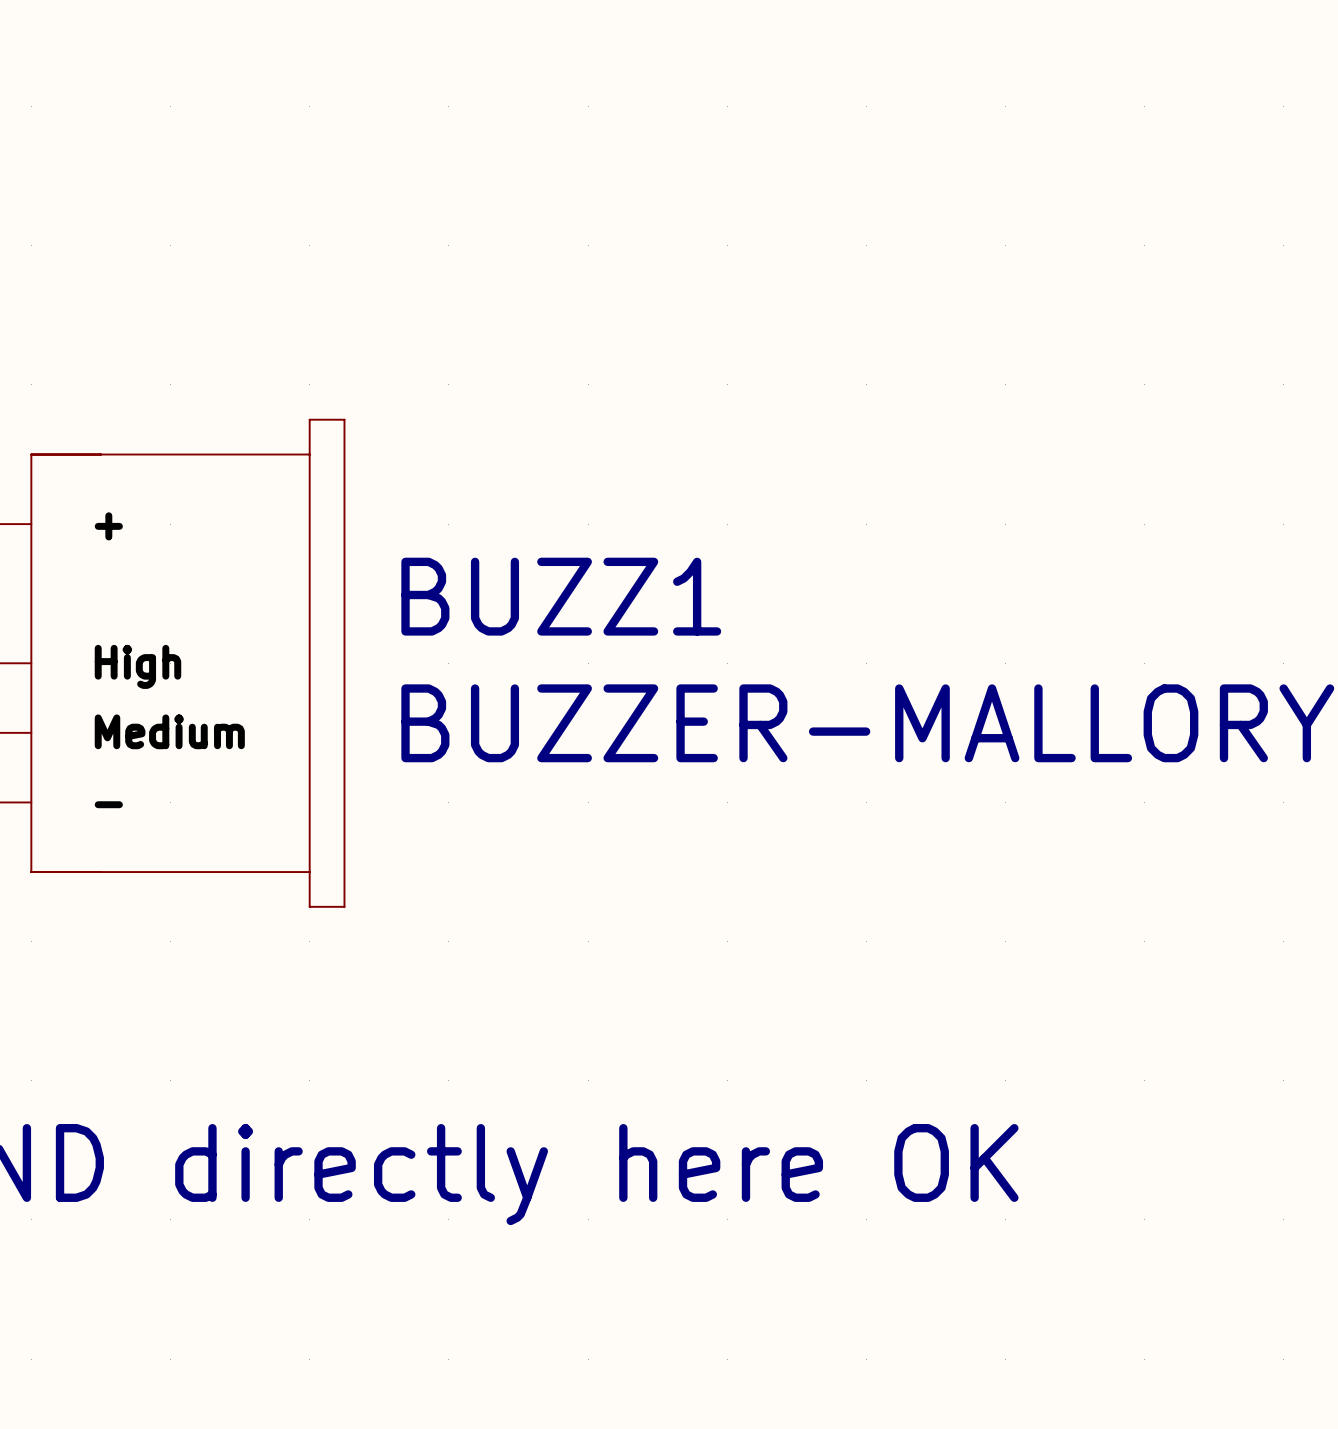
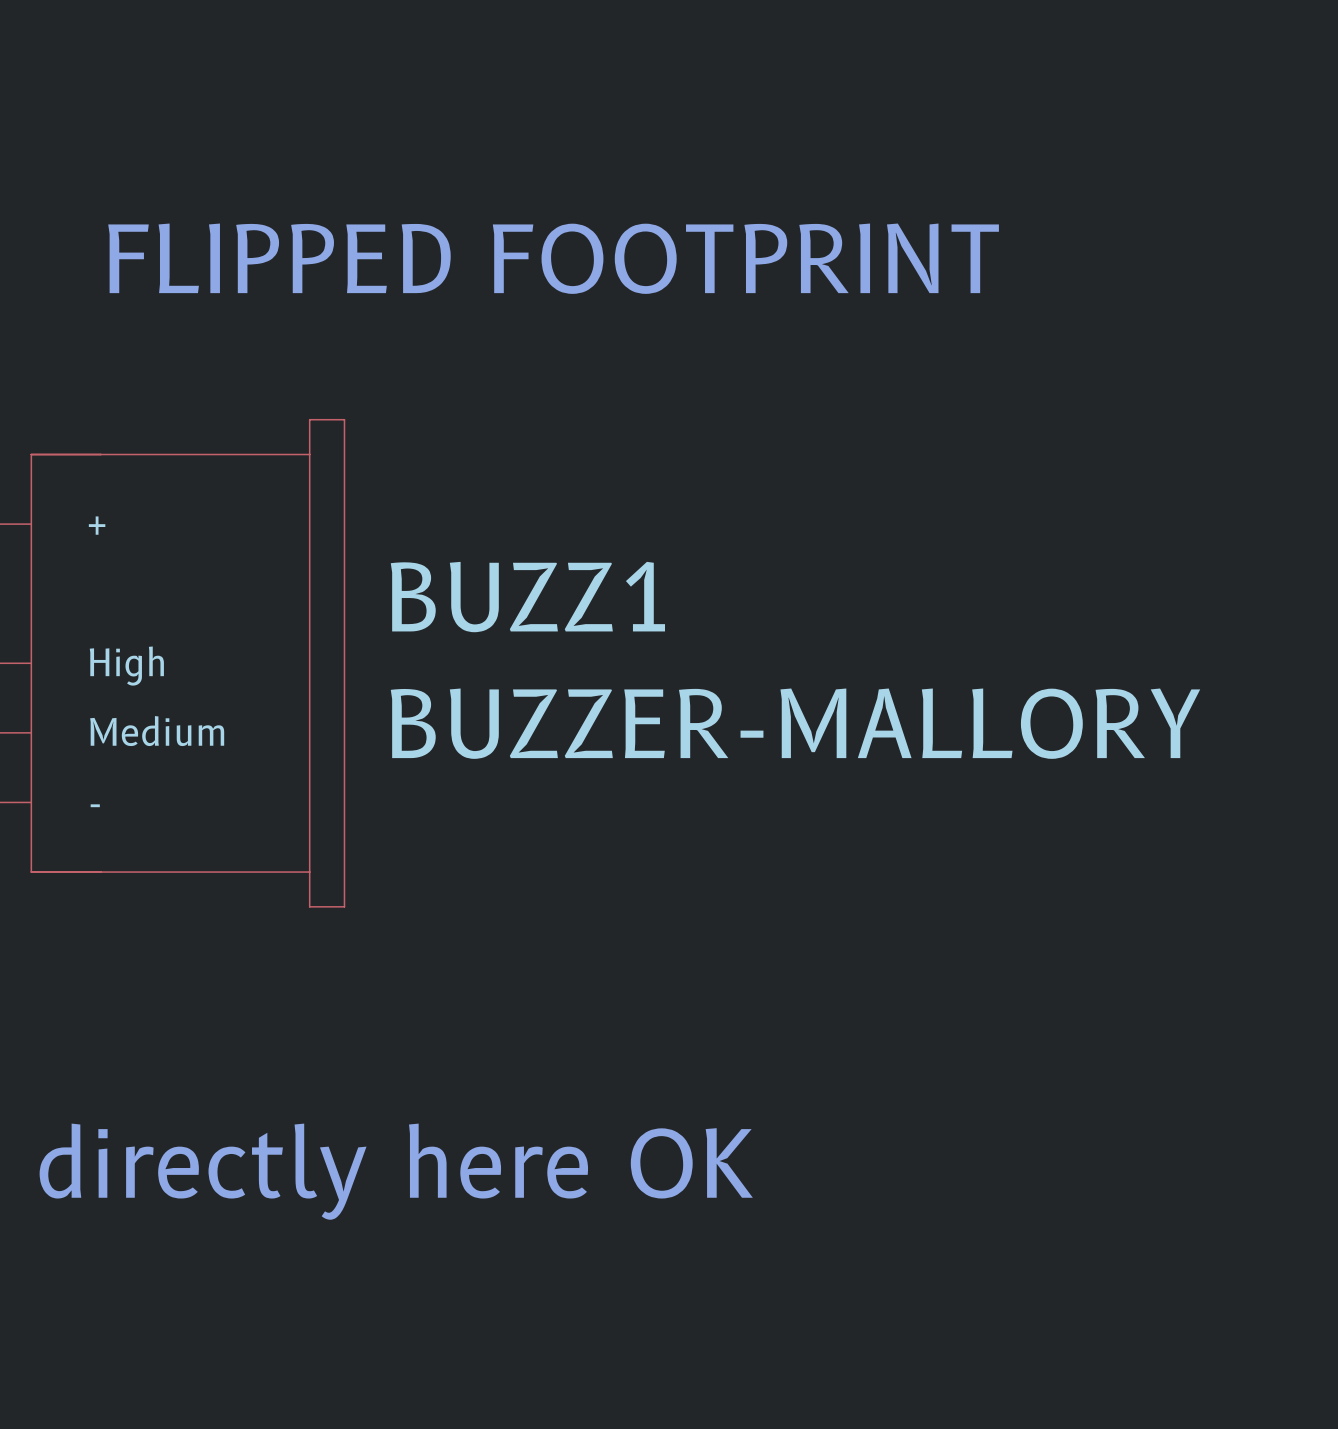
text: none -> FLIPPED FOOTPRINT (553, 258)

